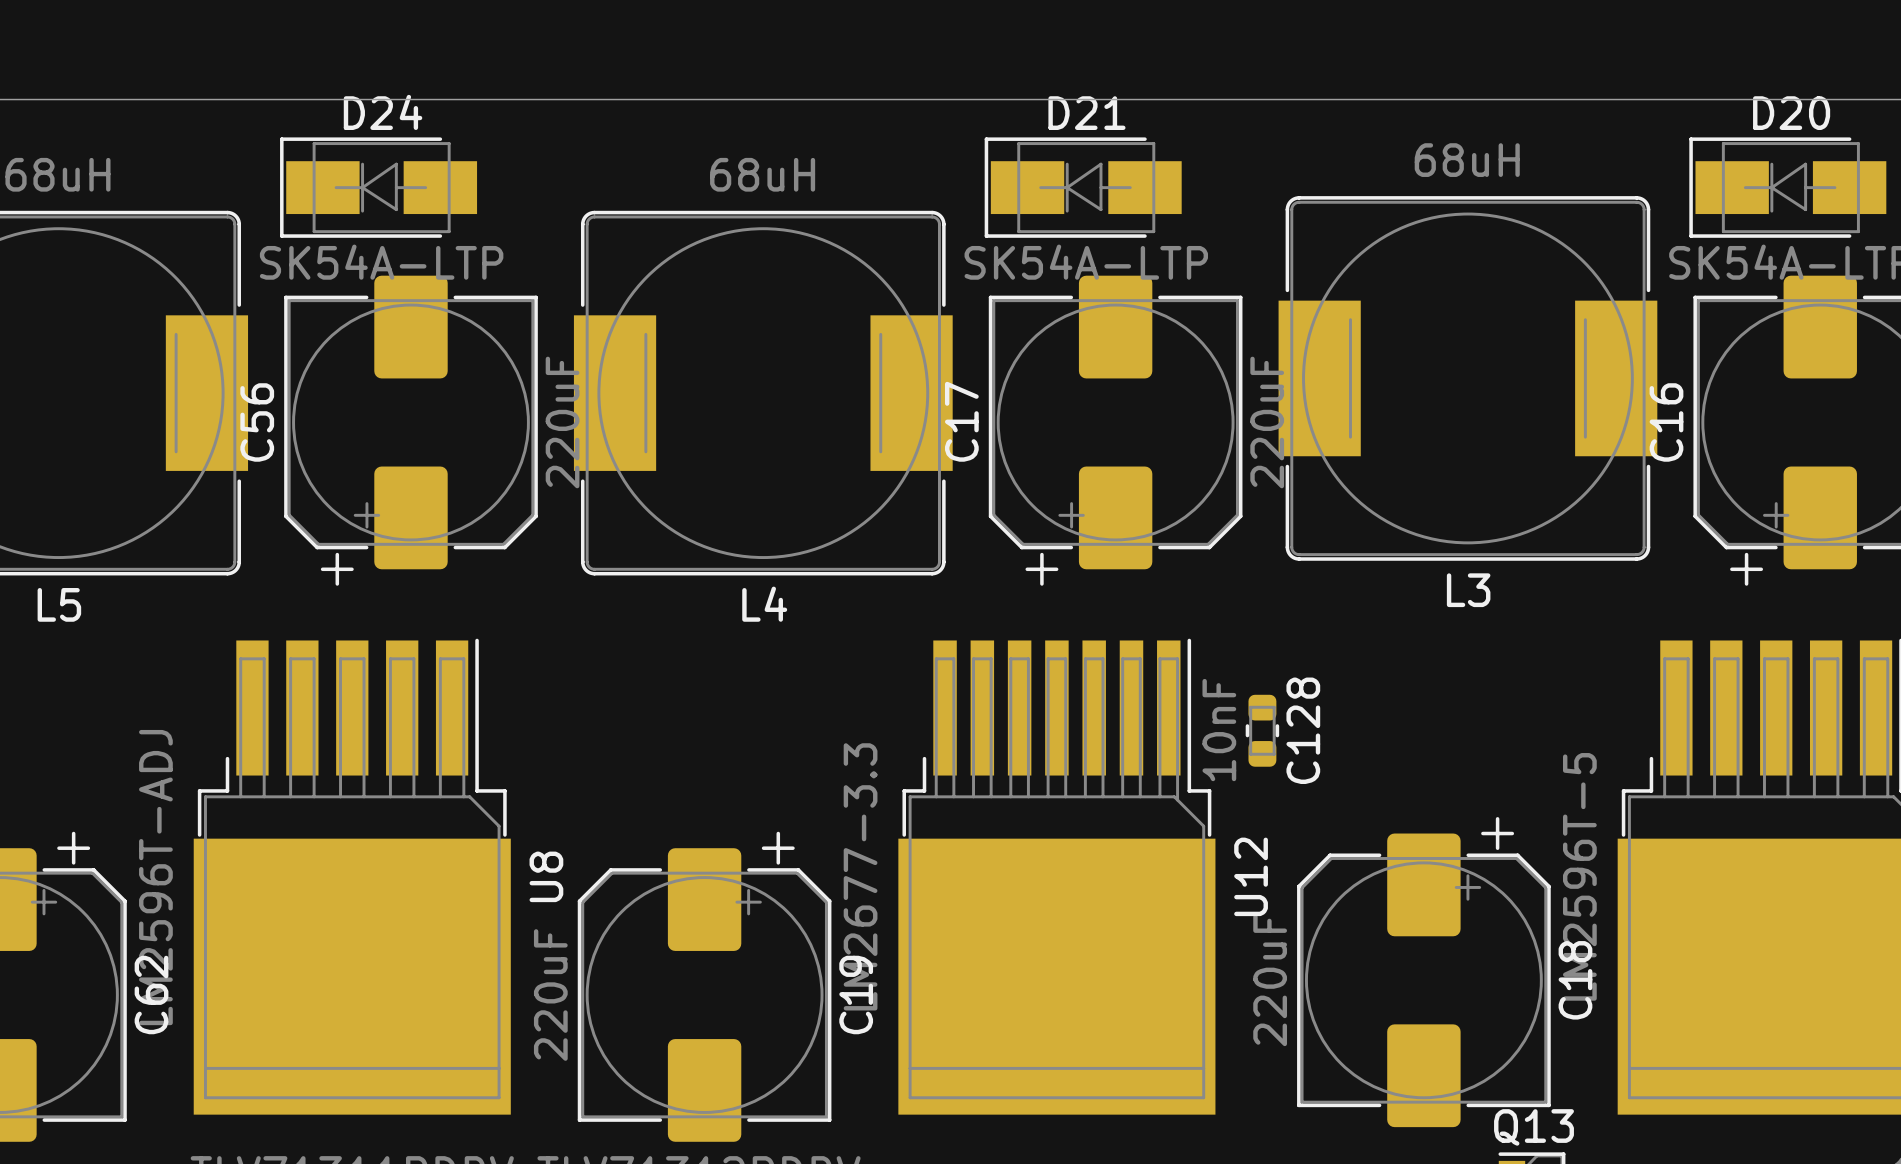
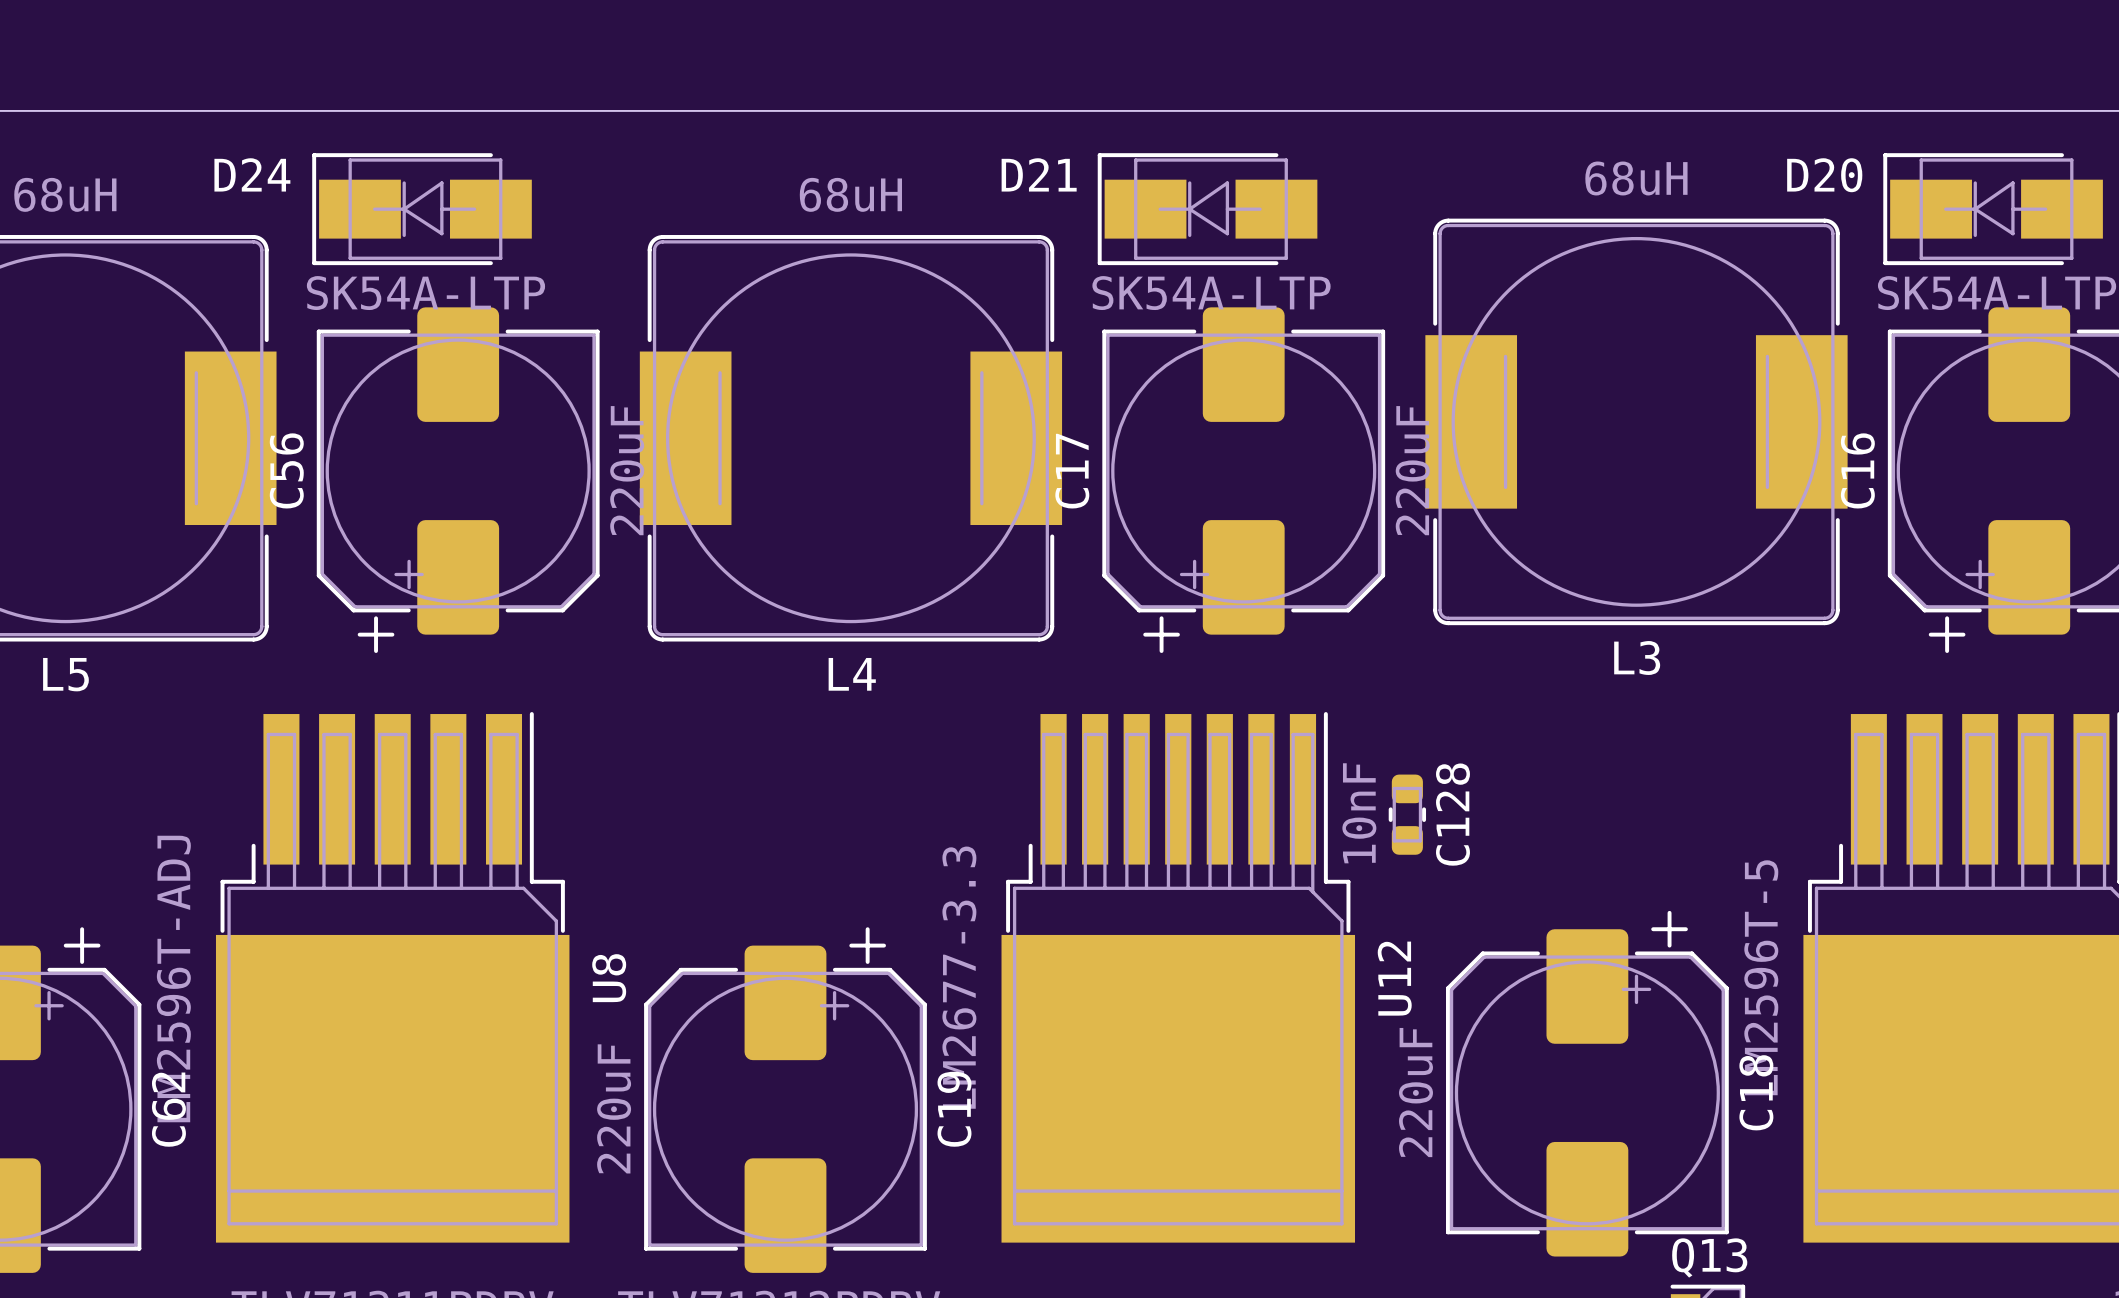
D24 name position: D24 (383, 112) -> D24 (252, 174)
D21 name position: D21 (1086, 113) -> D21 (1039, 174)
D20 name position: D20 (1791, 113) -> D20 (1824, 175)

